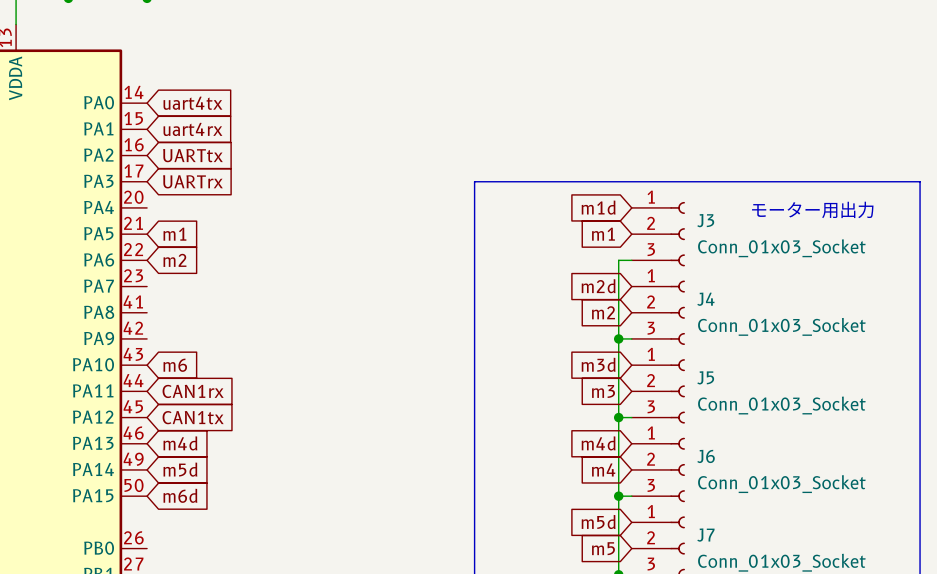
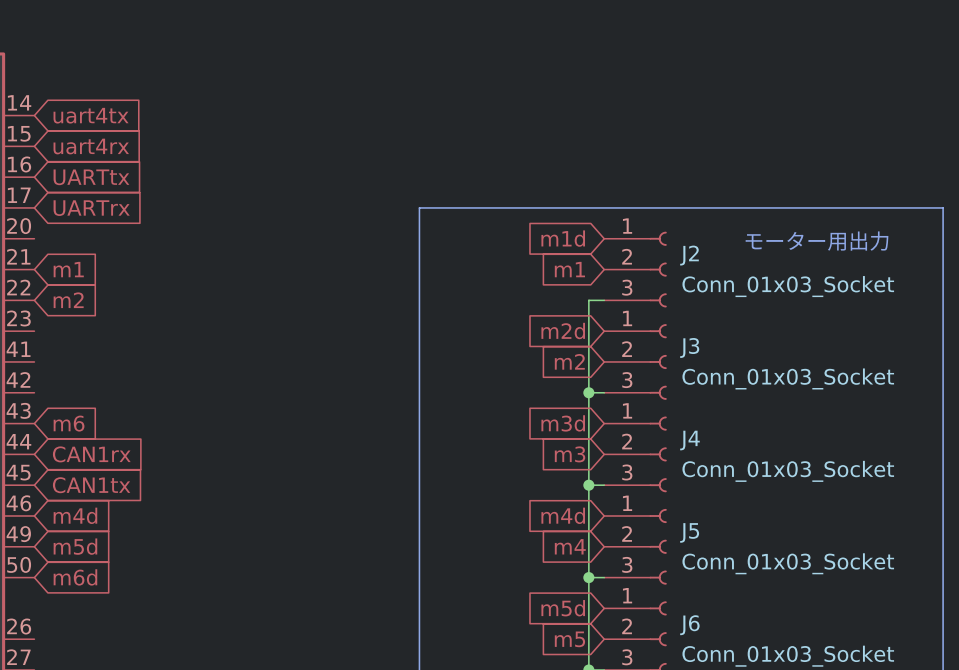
J3 name: J3 (705, 220) -> J2 (689, 255)
J4 name: J4 (705, 299) -> J3 (689, 347)
J5 name: J5 (705, 377) -> J4 (689, 440)
J6 name: J6 (706, 456) -> J5 (689, 532)
J7 name: J7 (705, 535) -> J6 (689, 625)

